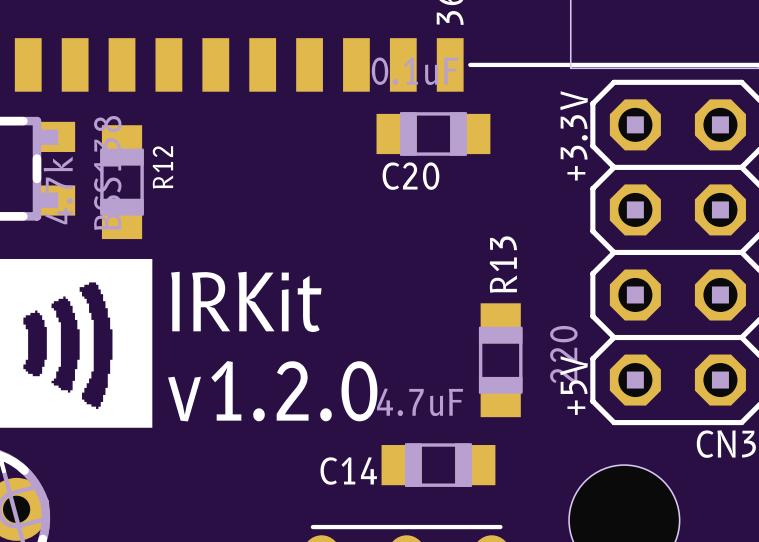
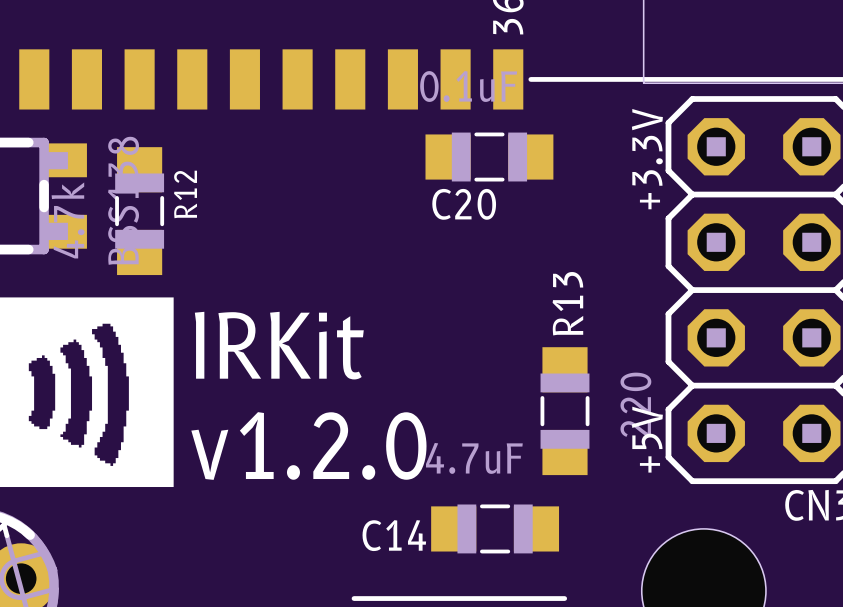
C20 footprint: [376, 112, 491, 156] -> [425, 132, 554, 182]
R12 footprint: [100, 125, 144, 240] -> [115, 147, 165, 276]
R13 footprint: [478, 303, 523, 418] -> [540, 347, 590, 476]
C14 footprint: [381, 443, 496, 487] -> [431, 504, 560, 554]

